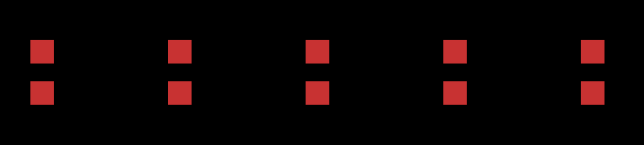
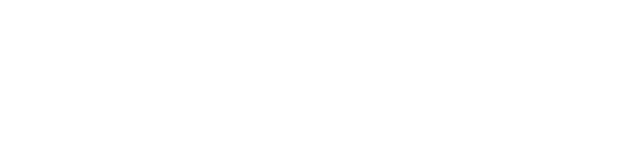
part: (42, 72) -> none
part: (179, 72) -> none
part: (317, 72) -> none
part: (455, 72) -> none
part: (592, 72) -> none

